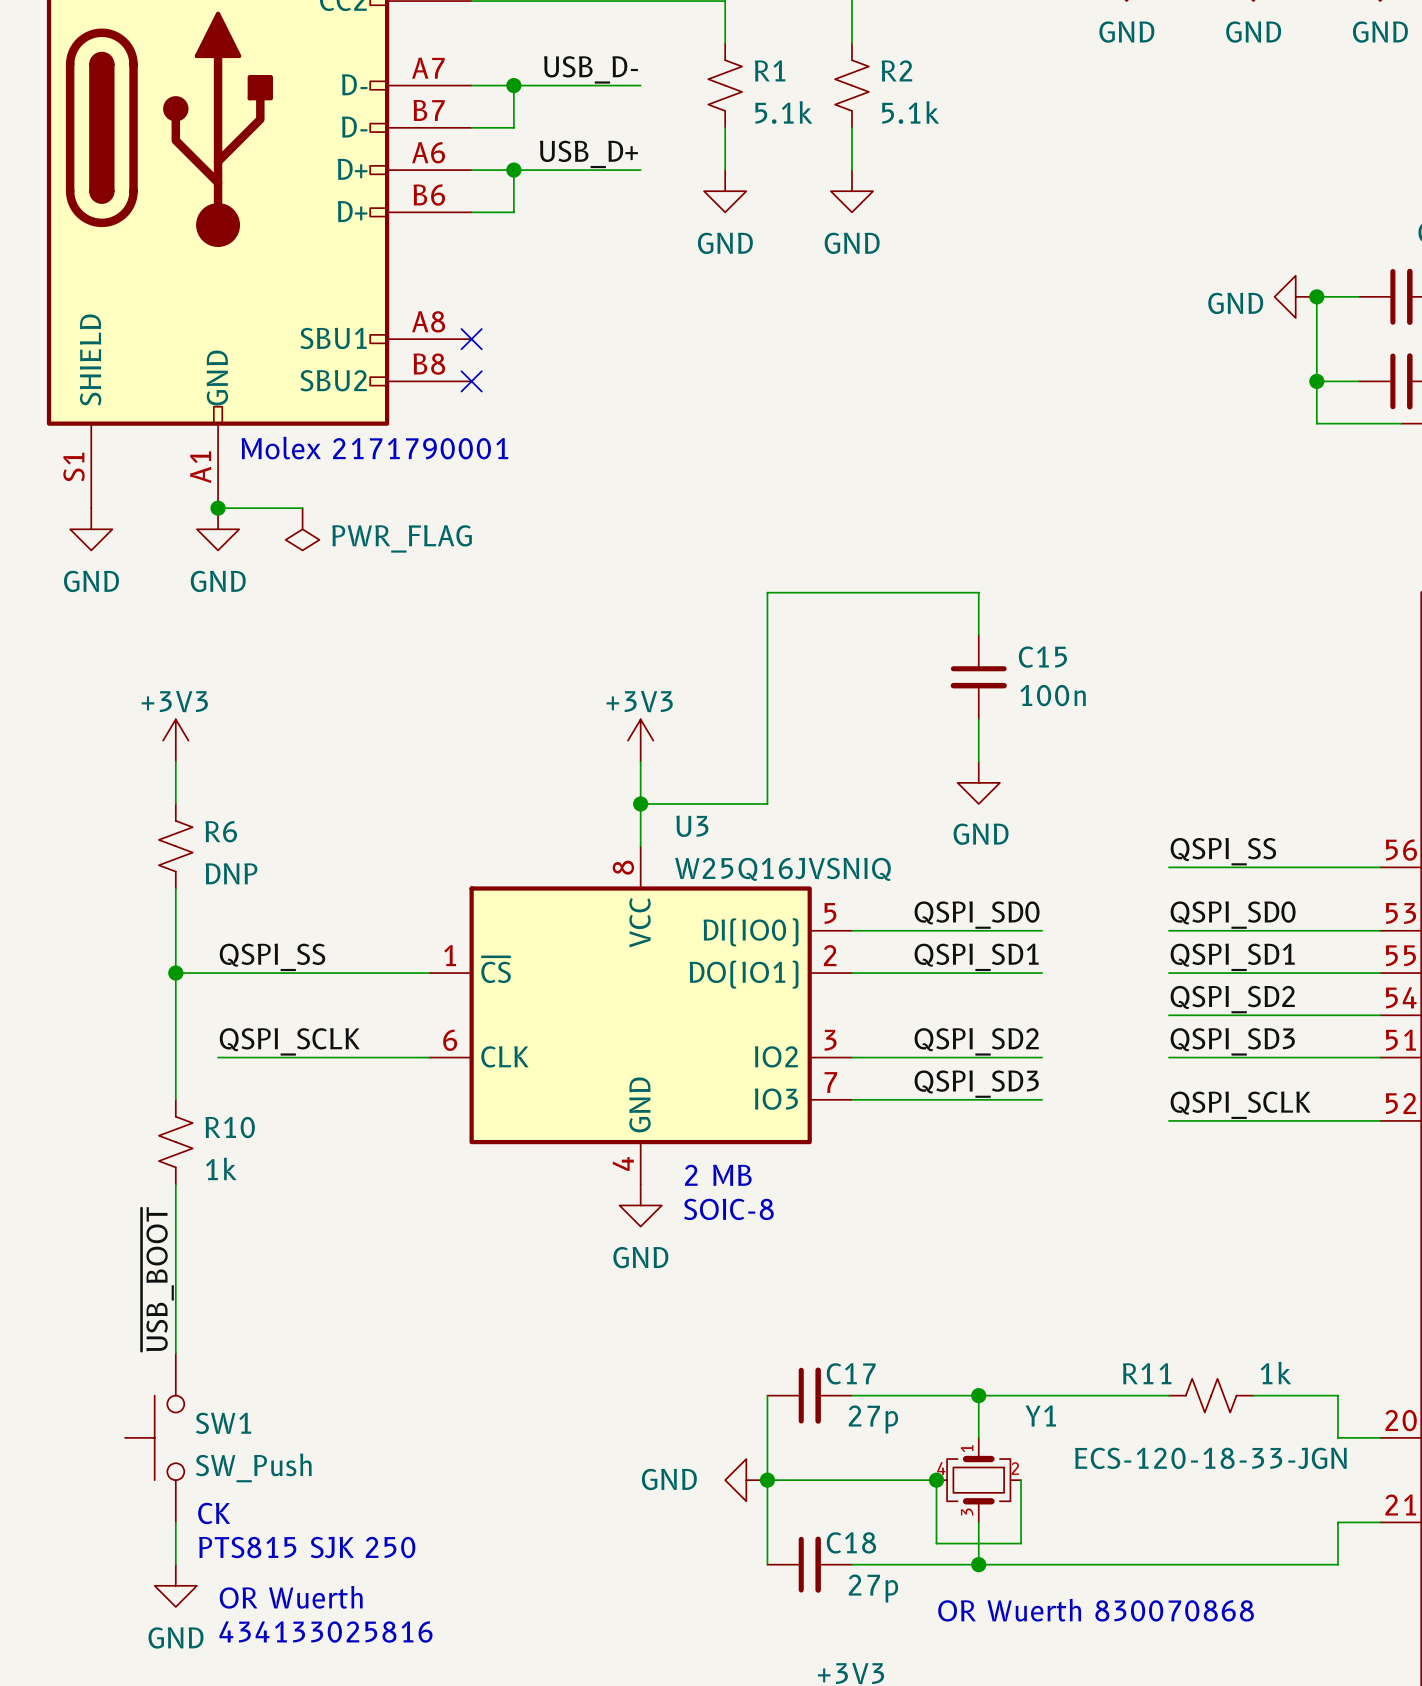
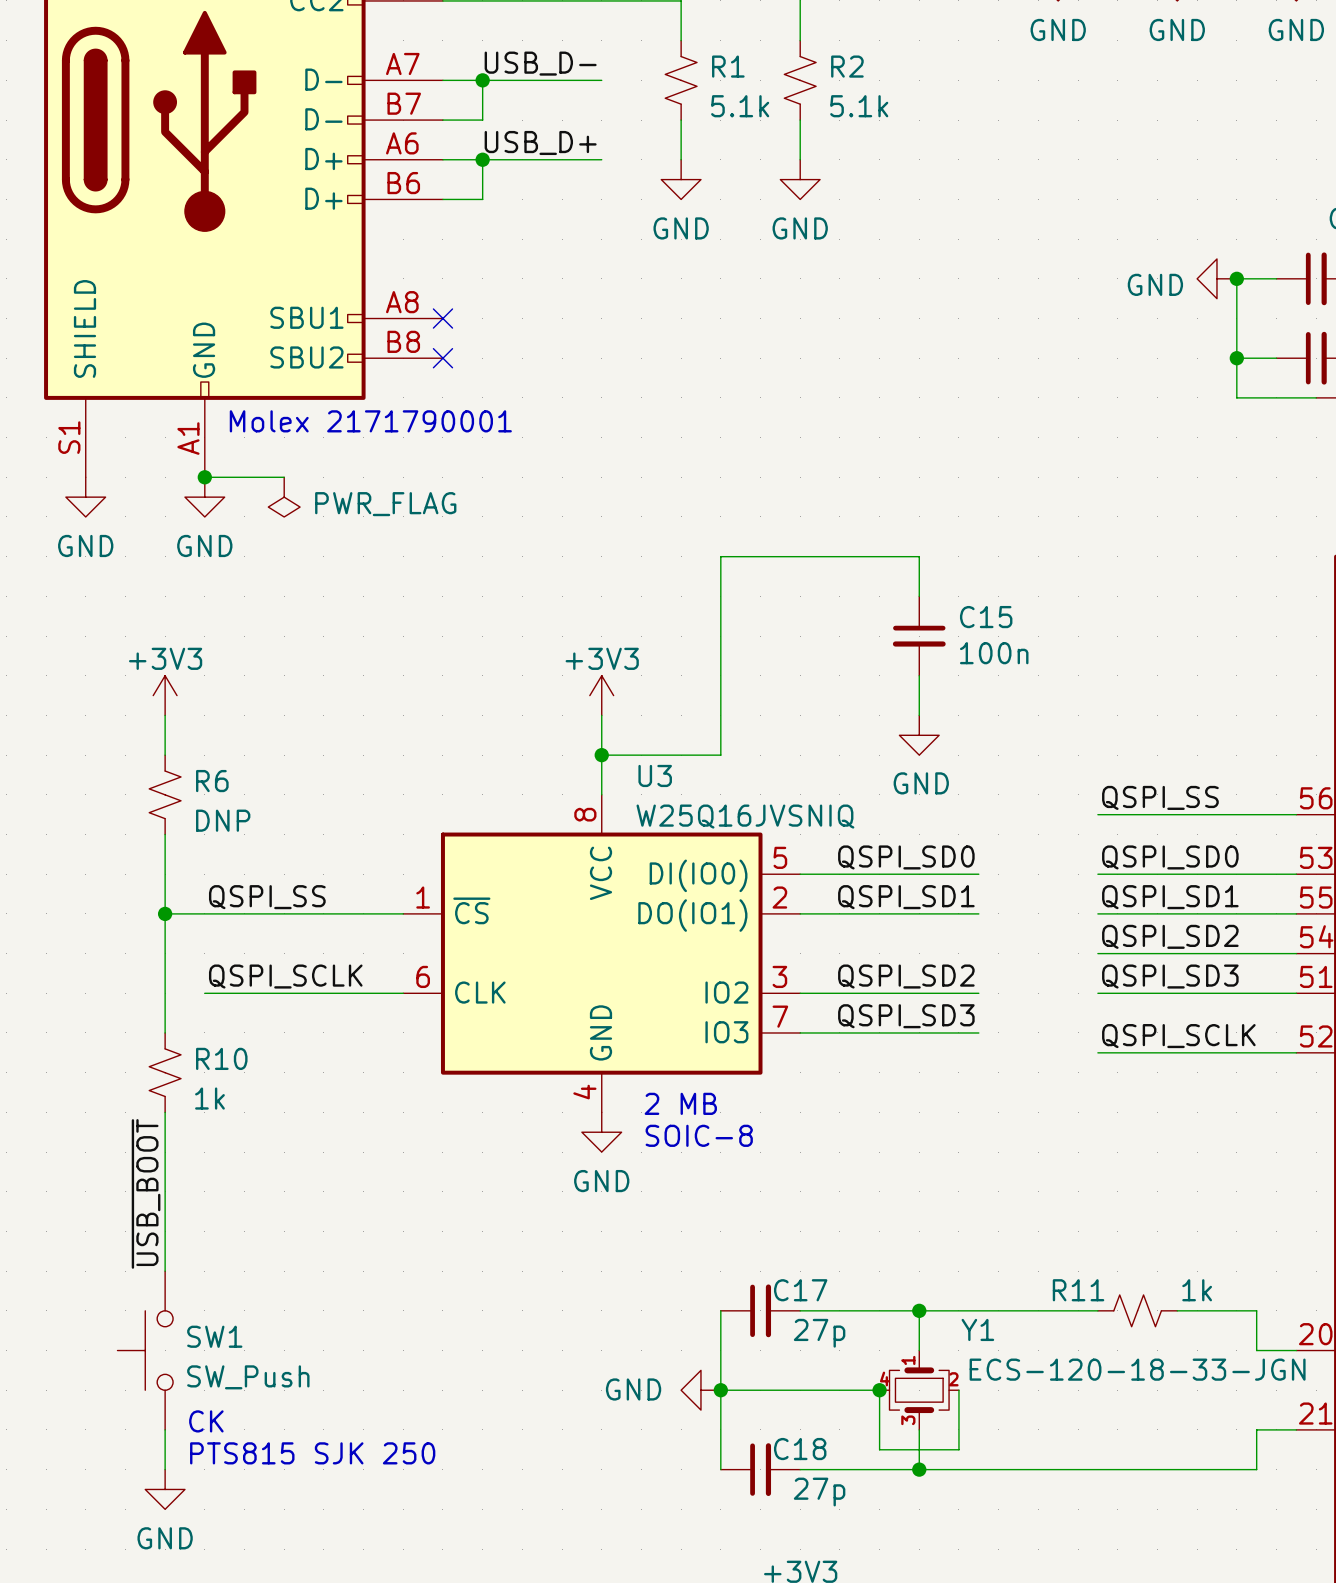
text: OR Wuerth (291, 1597) -> none
text: OR Wuerth 830070868 (1096, 1610) -> none
text: 434133025816 (325, 1632) -> none

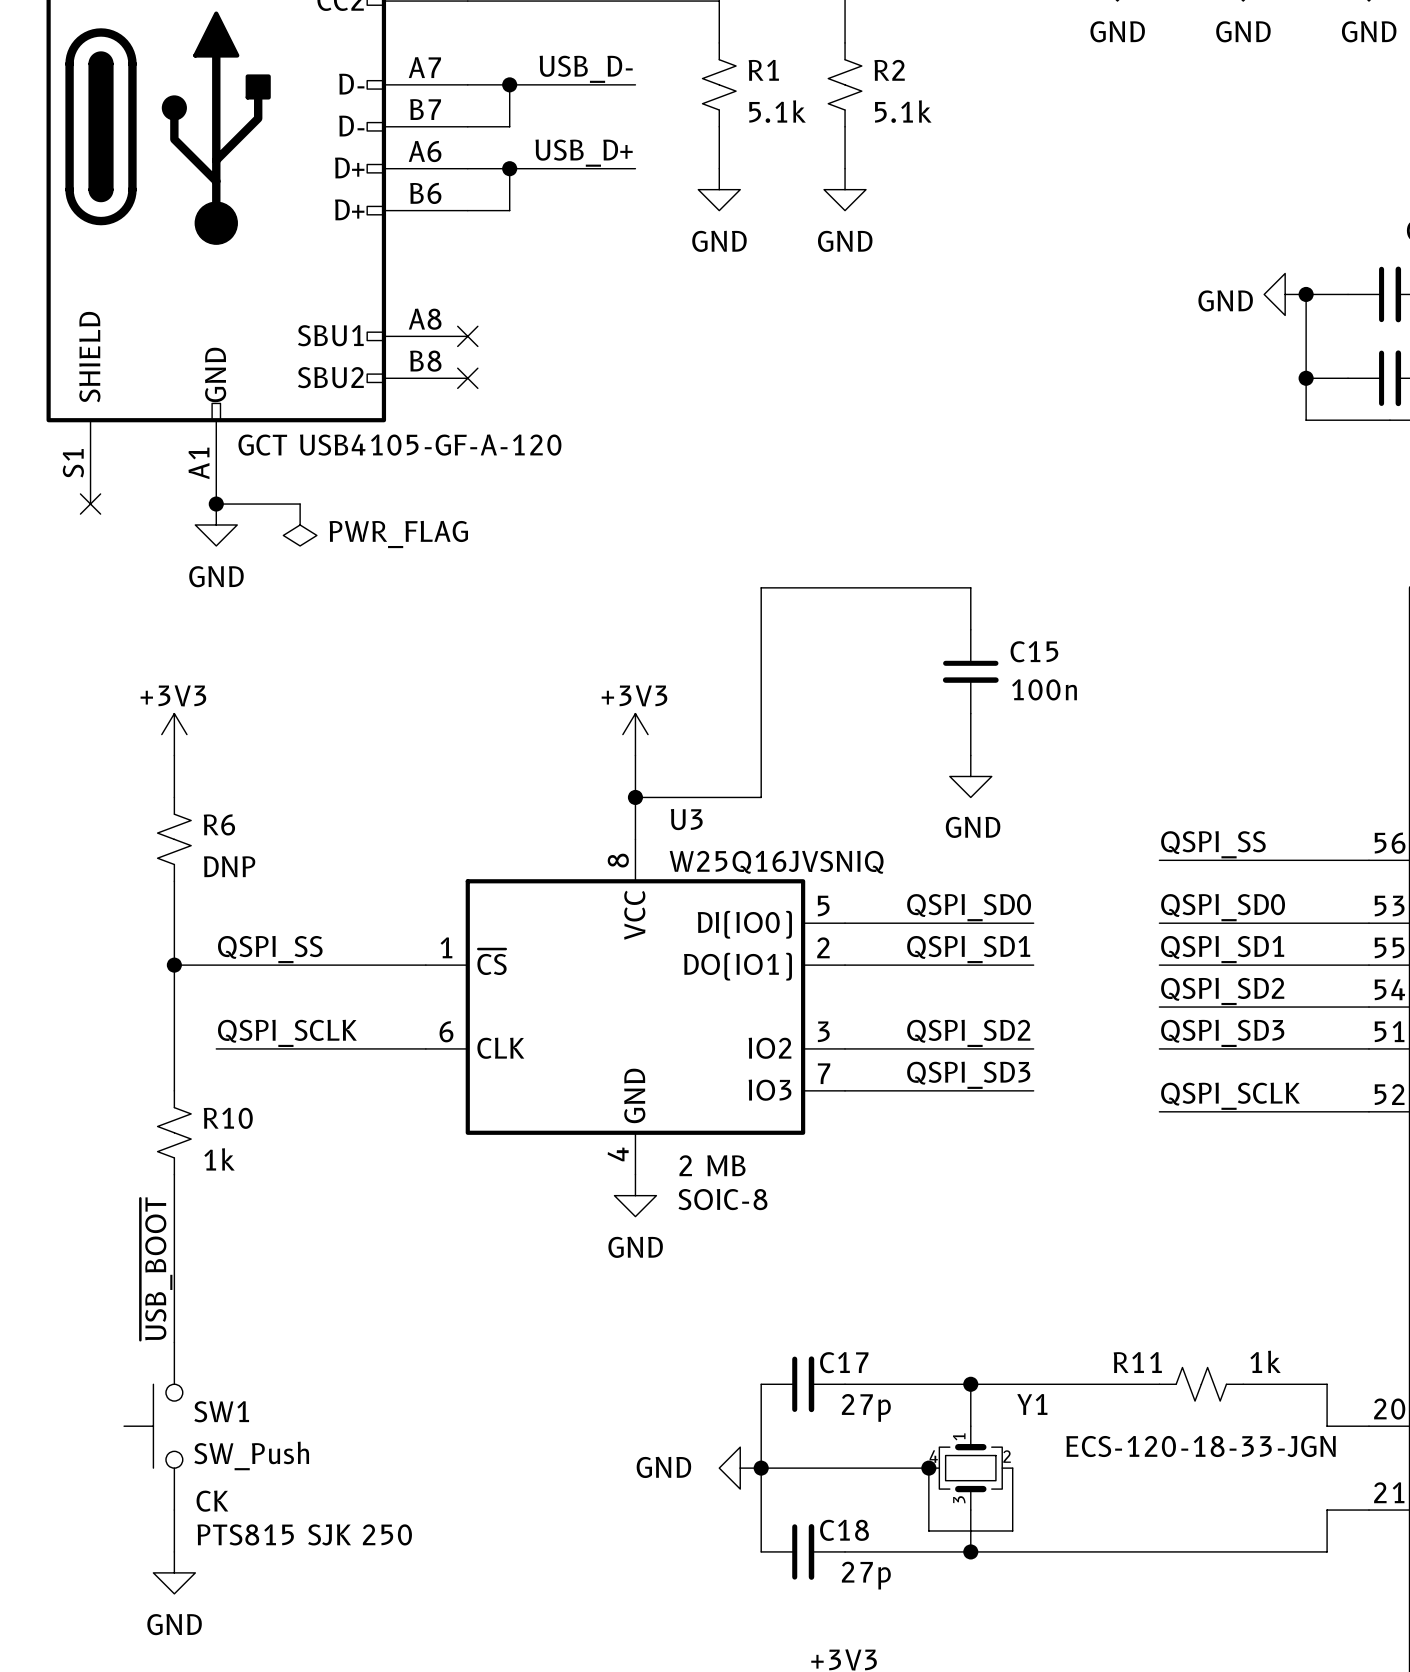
text: Molex 2171790001 (370, 421) -> GCT USB4105-GF-A-120 (399, 445)
no-connect mark: none -> (90, 504)
power symbol: GND (85, 497) -> none

